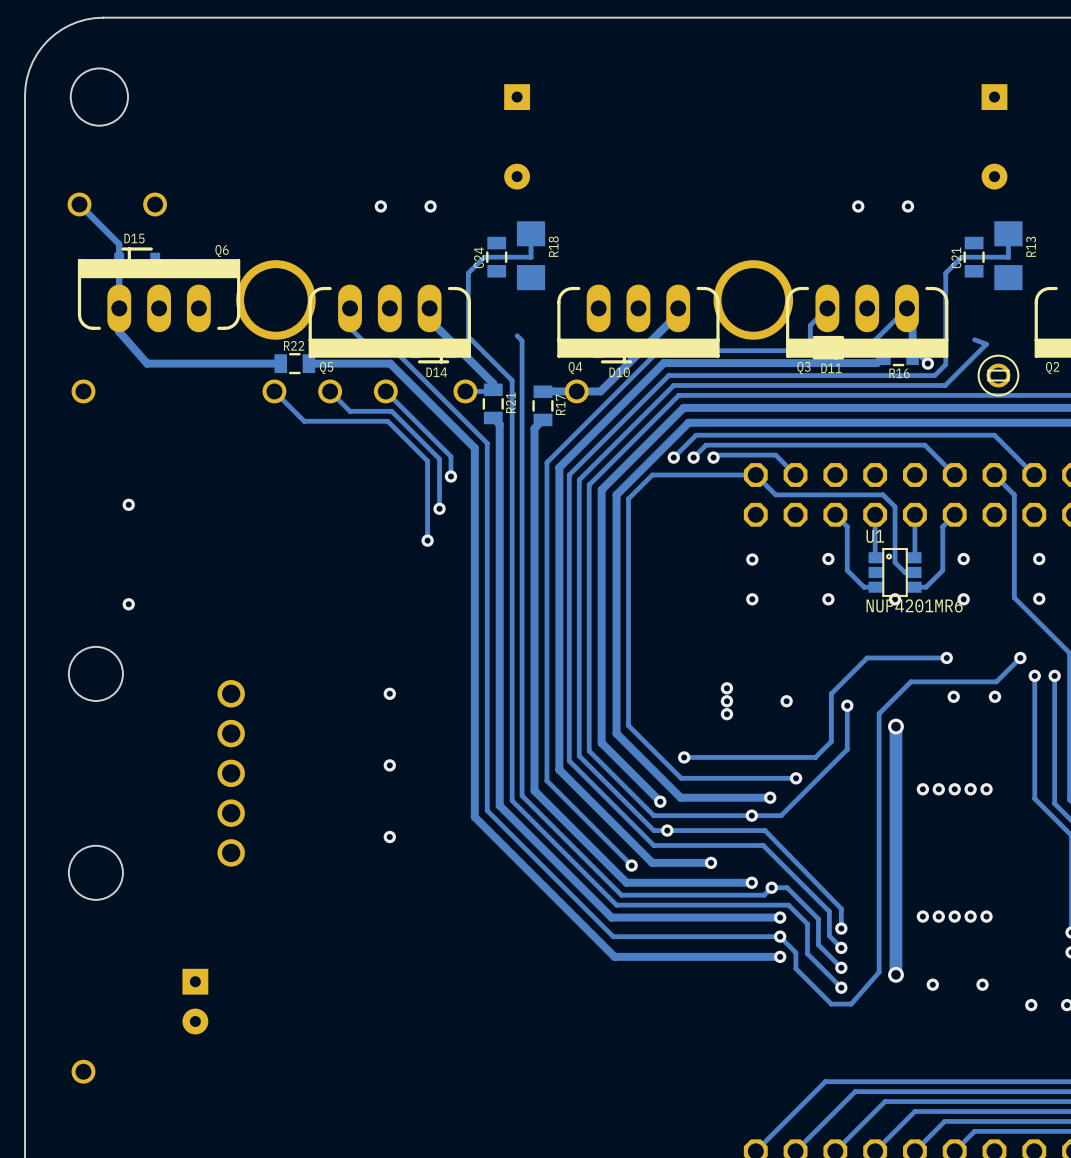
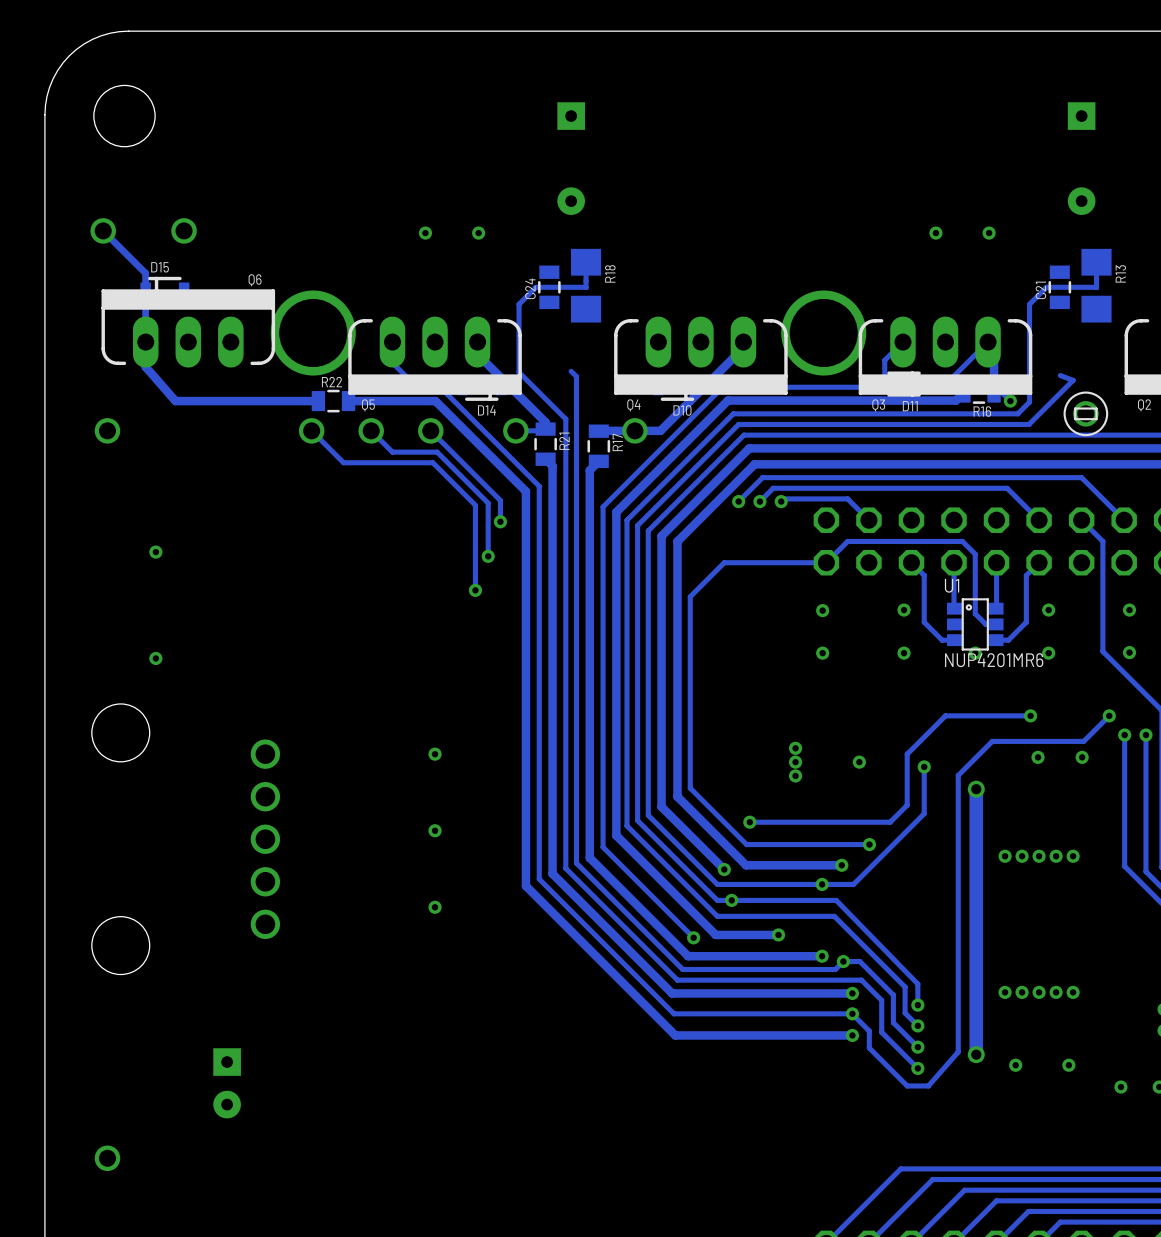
track: (775, 494) (755, 474) (652, 474) (628, 498) (628, 546) -> (847, 541) (826, 562) (724, 562) (690, 596)

